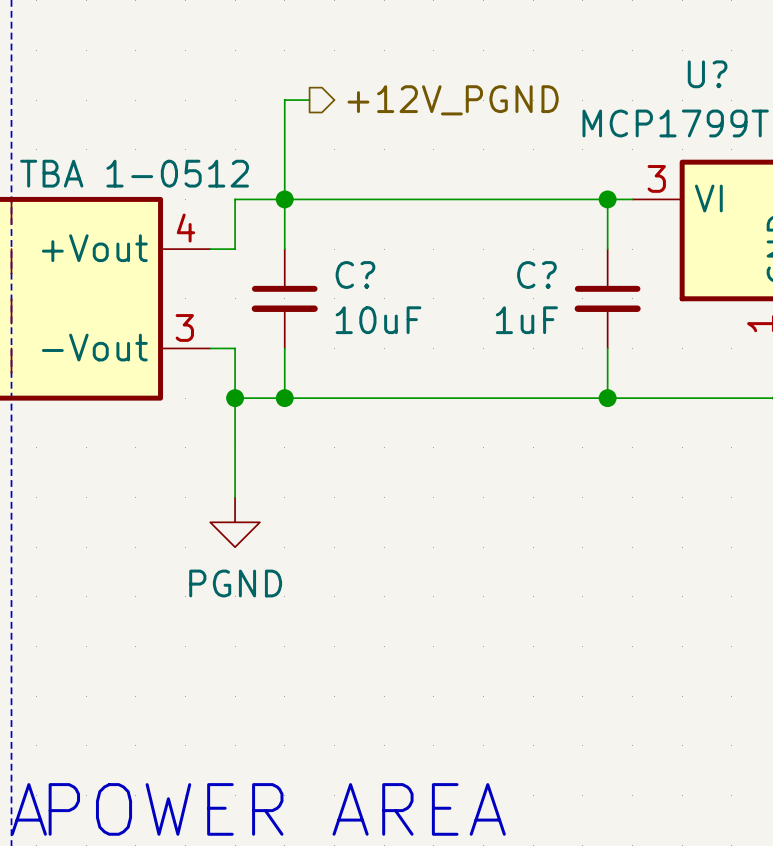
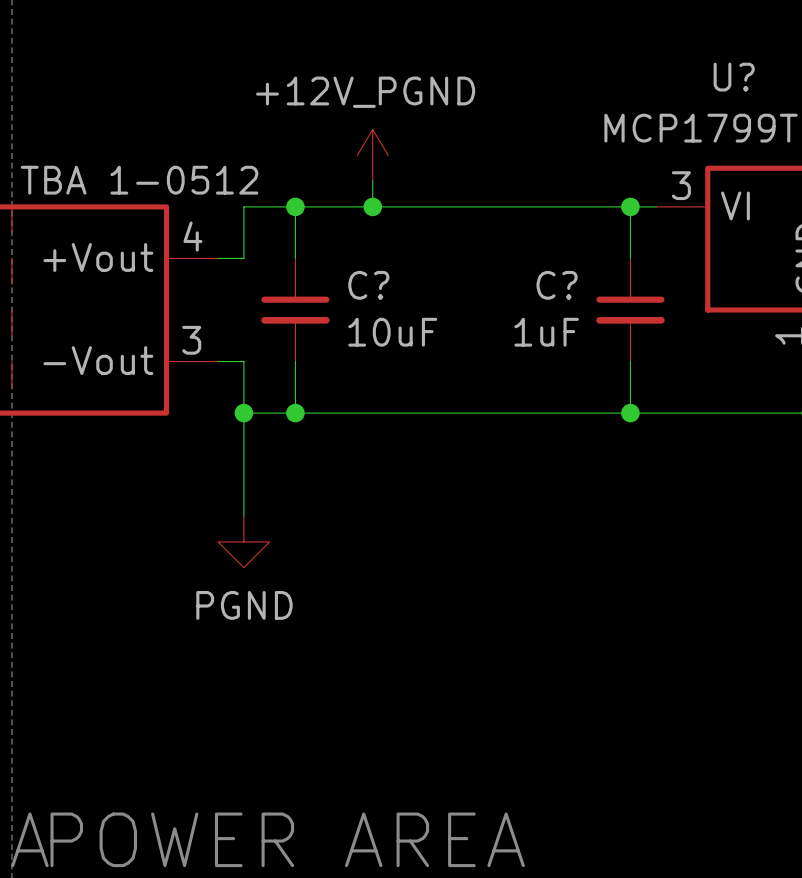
wire: (309, 100) (284, 100) (284, 199) -> none
hierarchical label: +12V_PGND (453, 100) -> none
power symbol: none -> +12V_PGND (372, 155)
wire: none -> (372, 181) (372, 206)
junction: none -> (372, 206)

